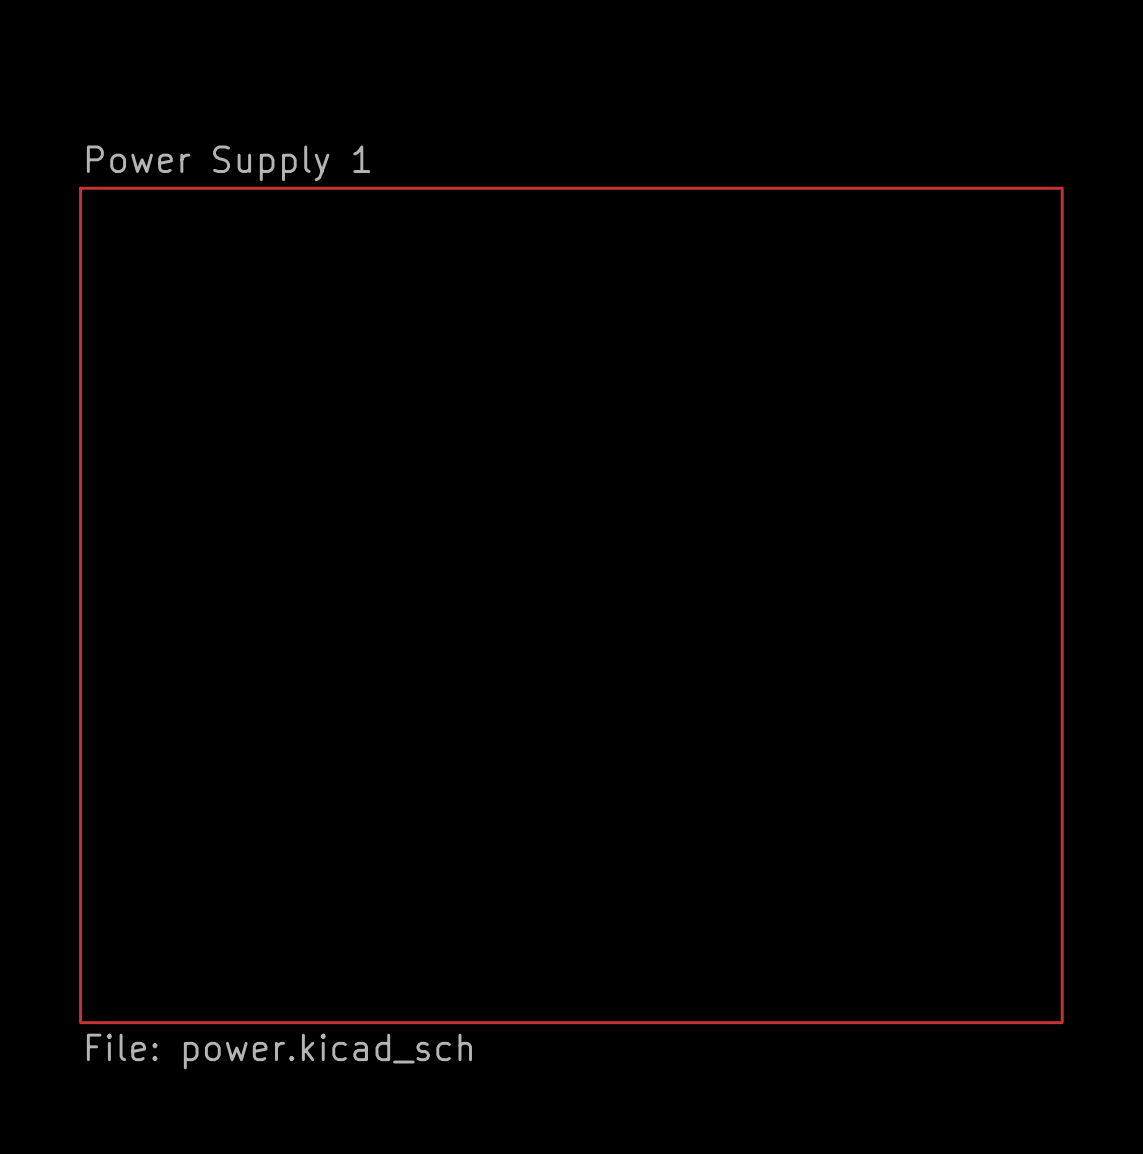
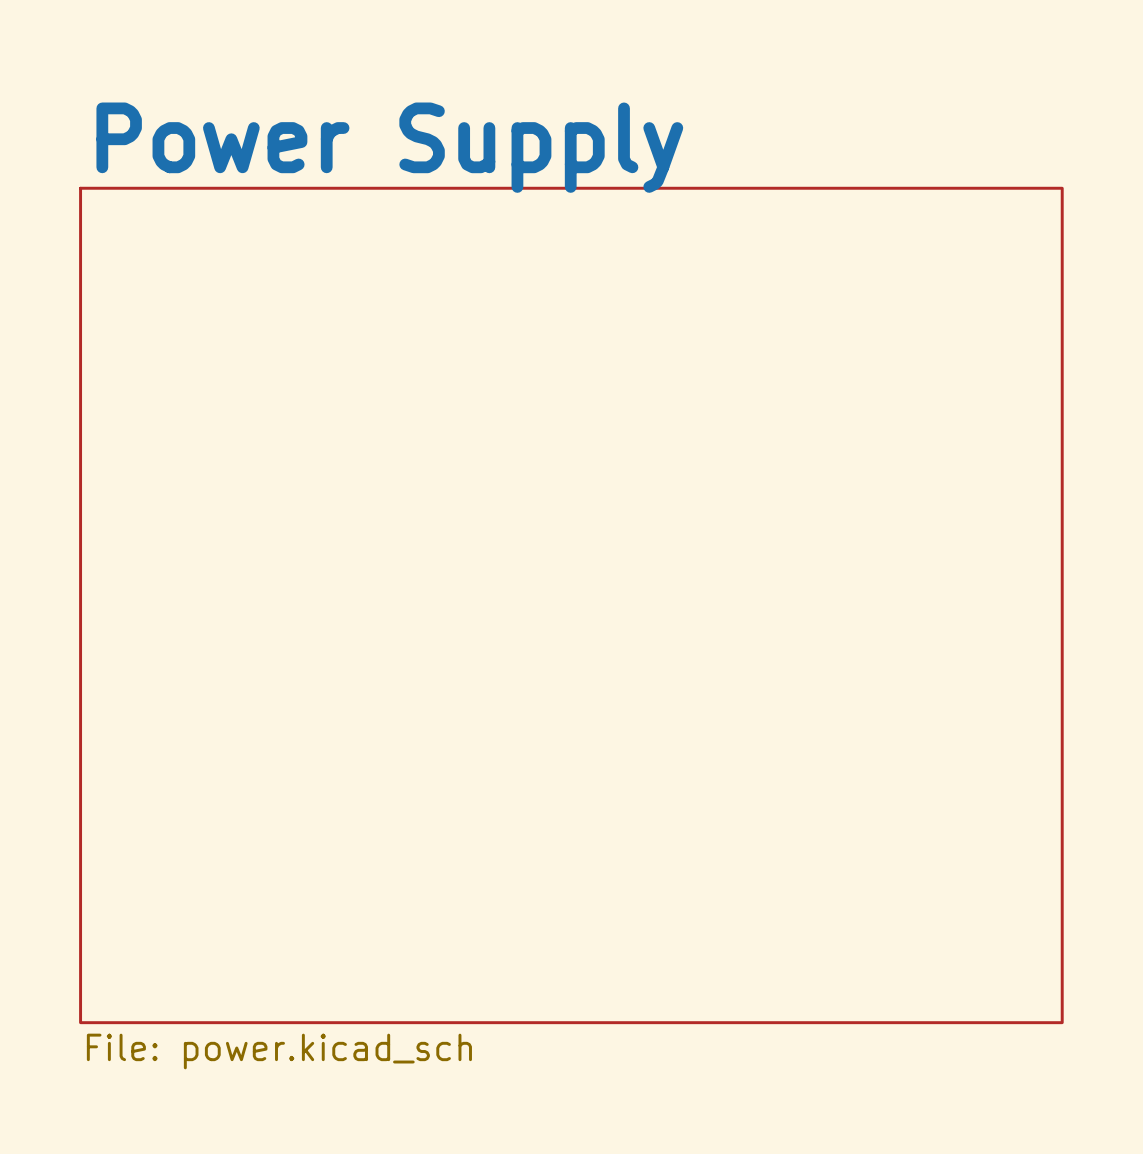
sheet Power Supply 1 name: Power Supply 1 (228, 163) -> Power Supply (389, 147)

